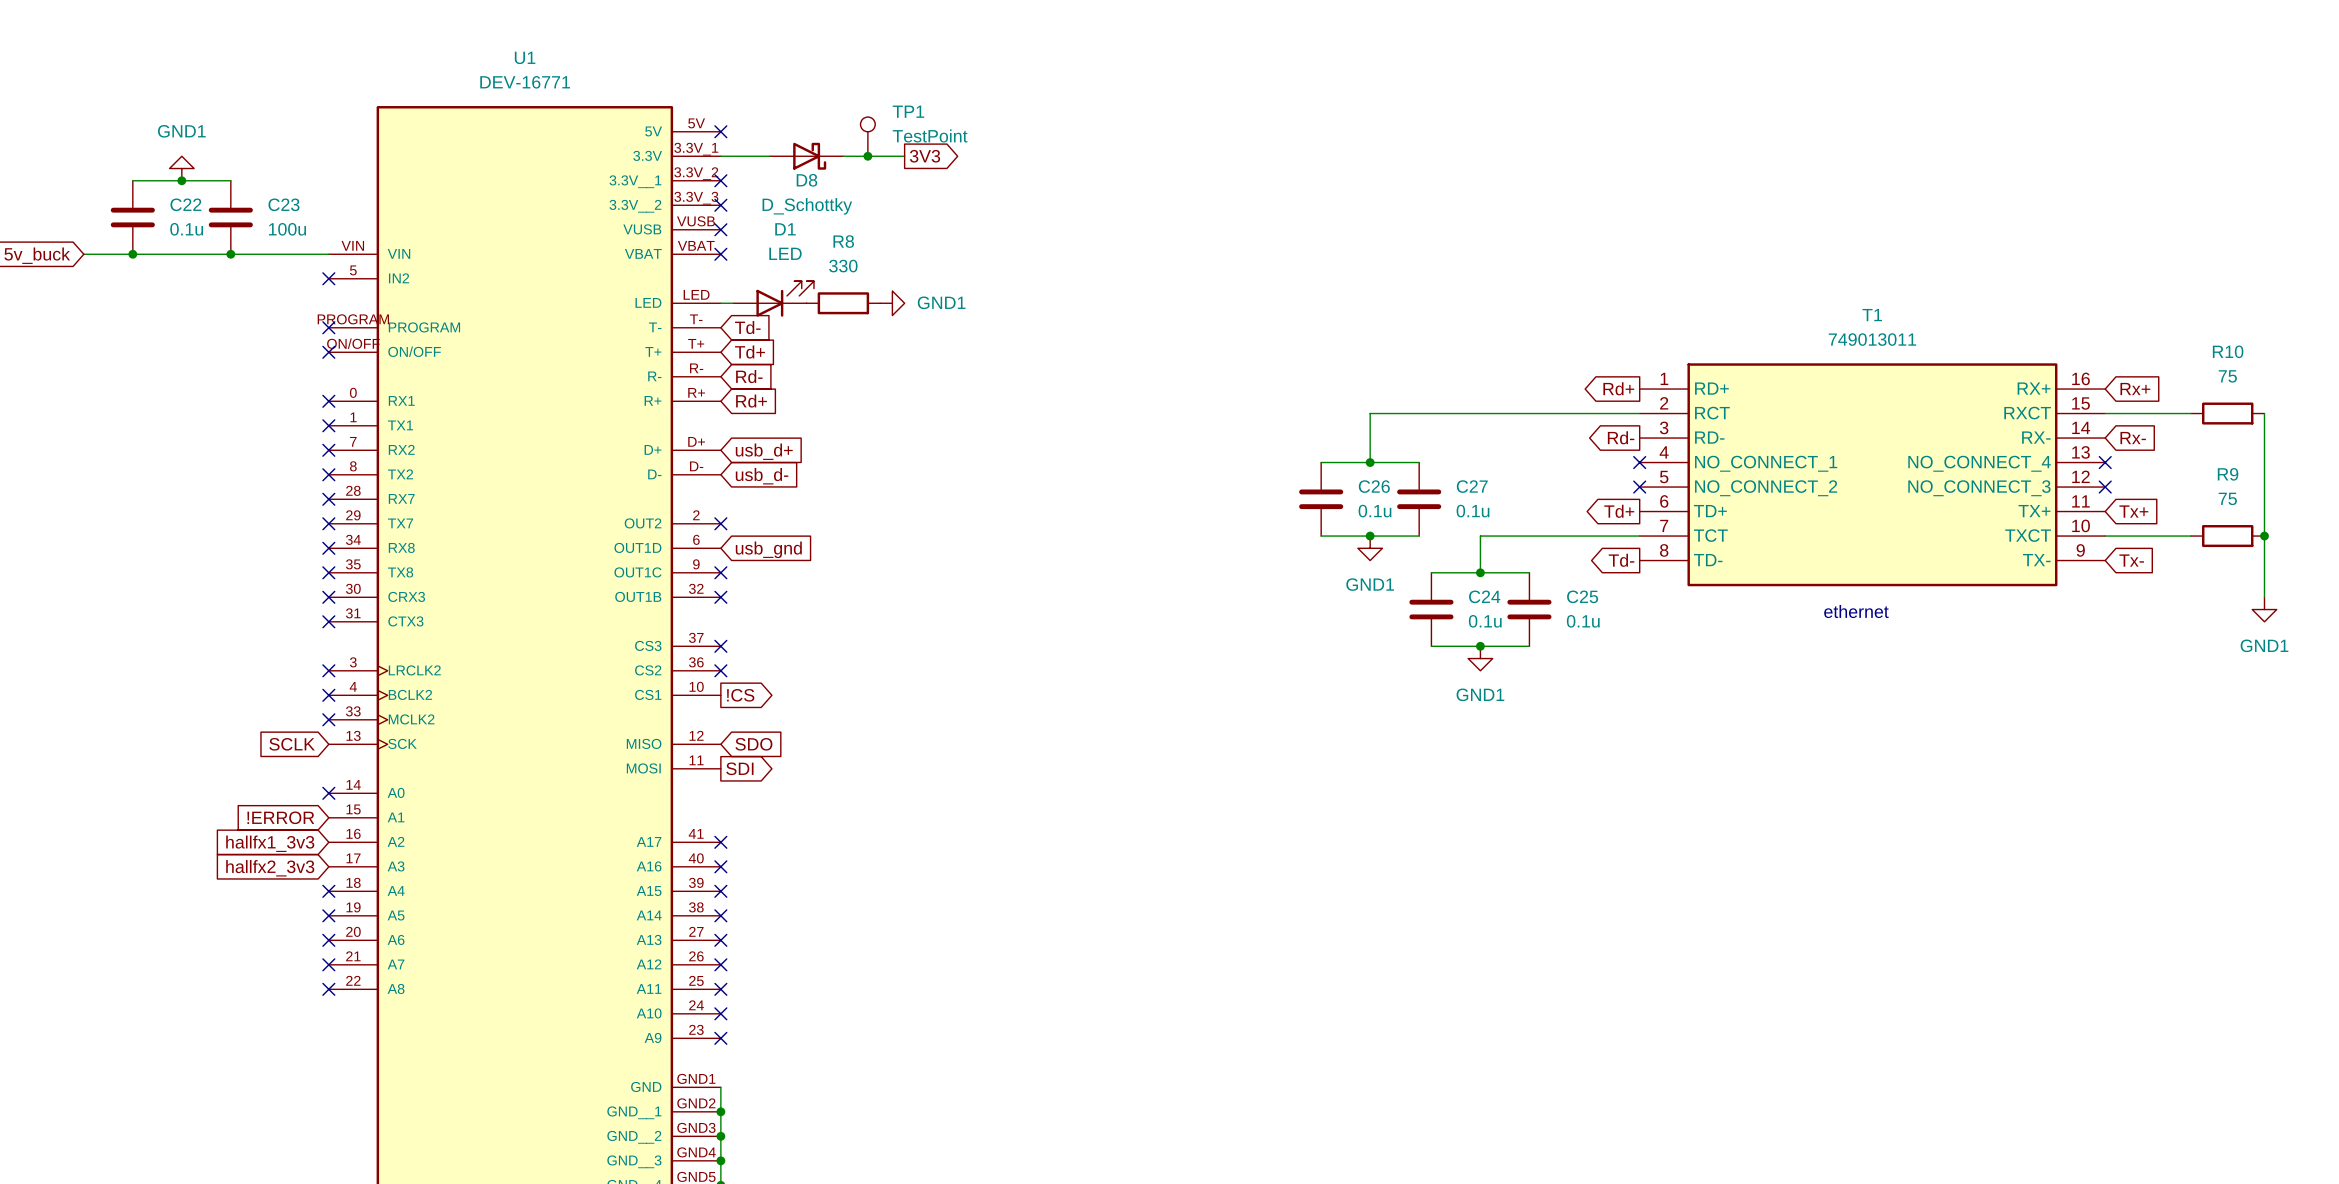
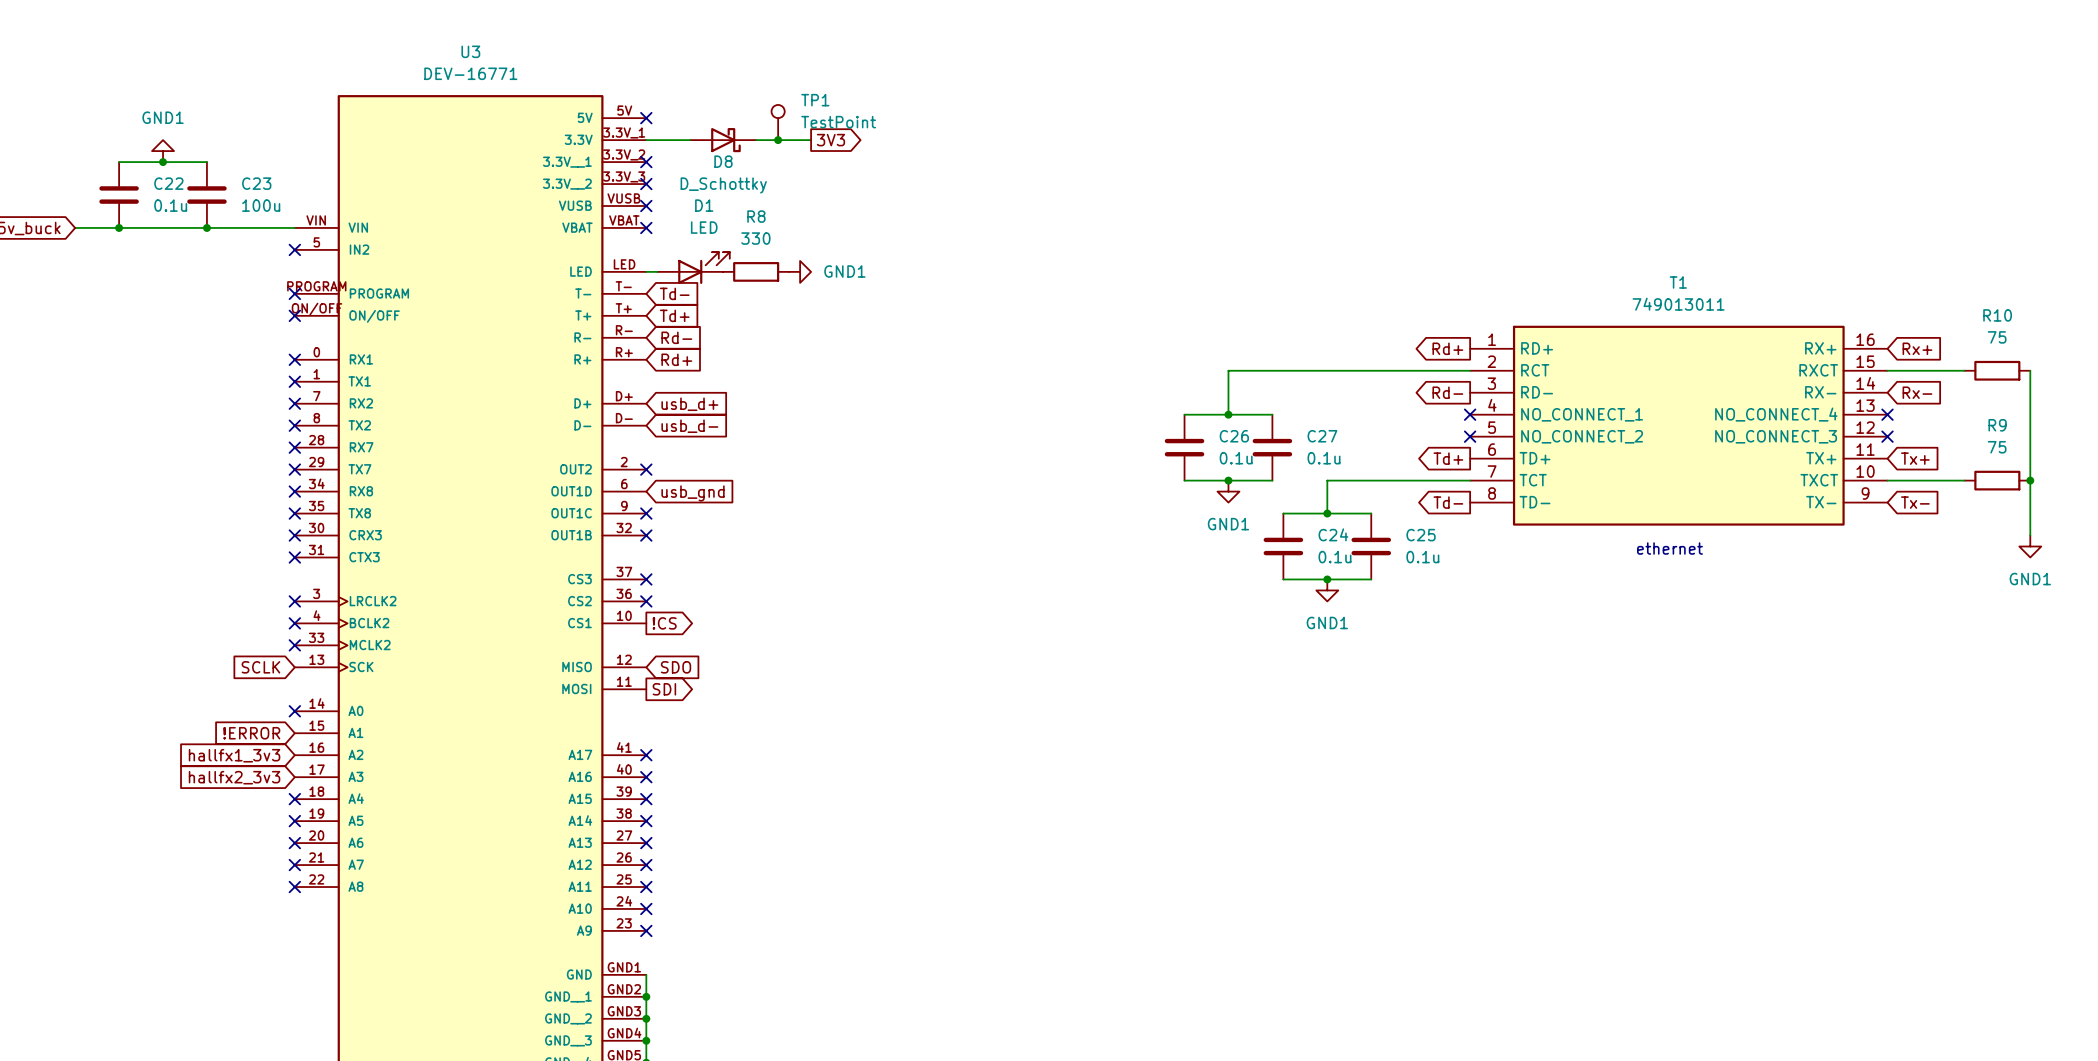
U1 name: U1 (525, 57) -> U3 (470, 51)

